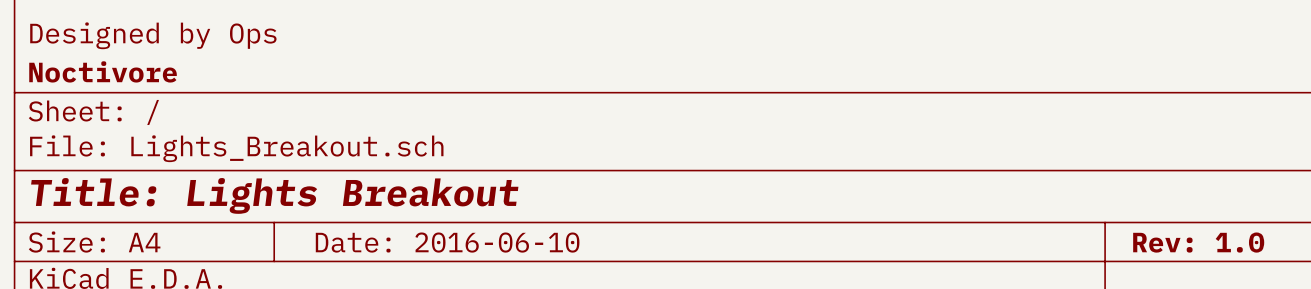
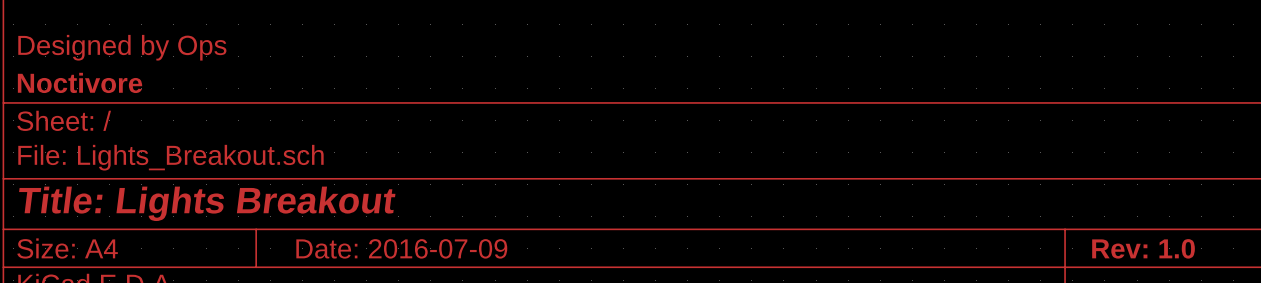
title block: Date: 2016-06-10 (447, 242) -> Date: 2016-07-09 (401, 248)

